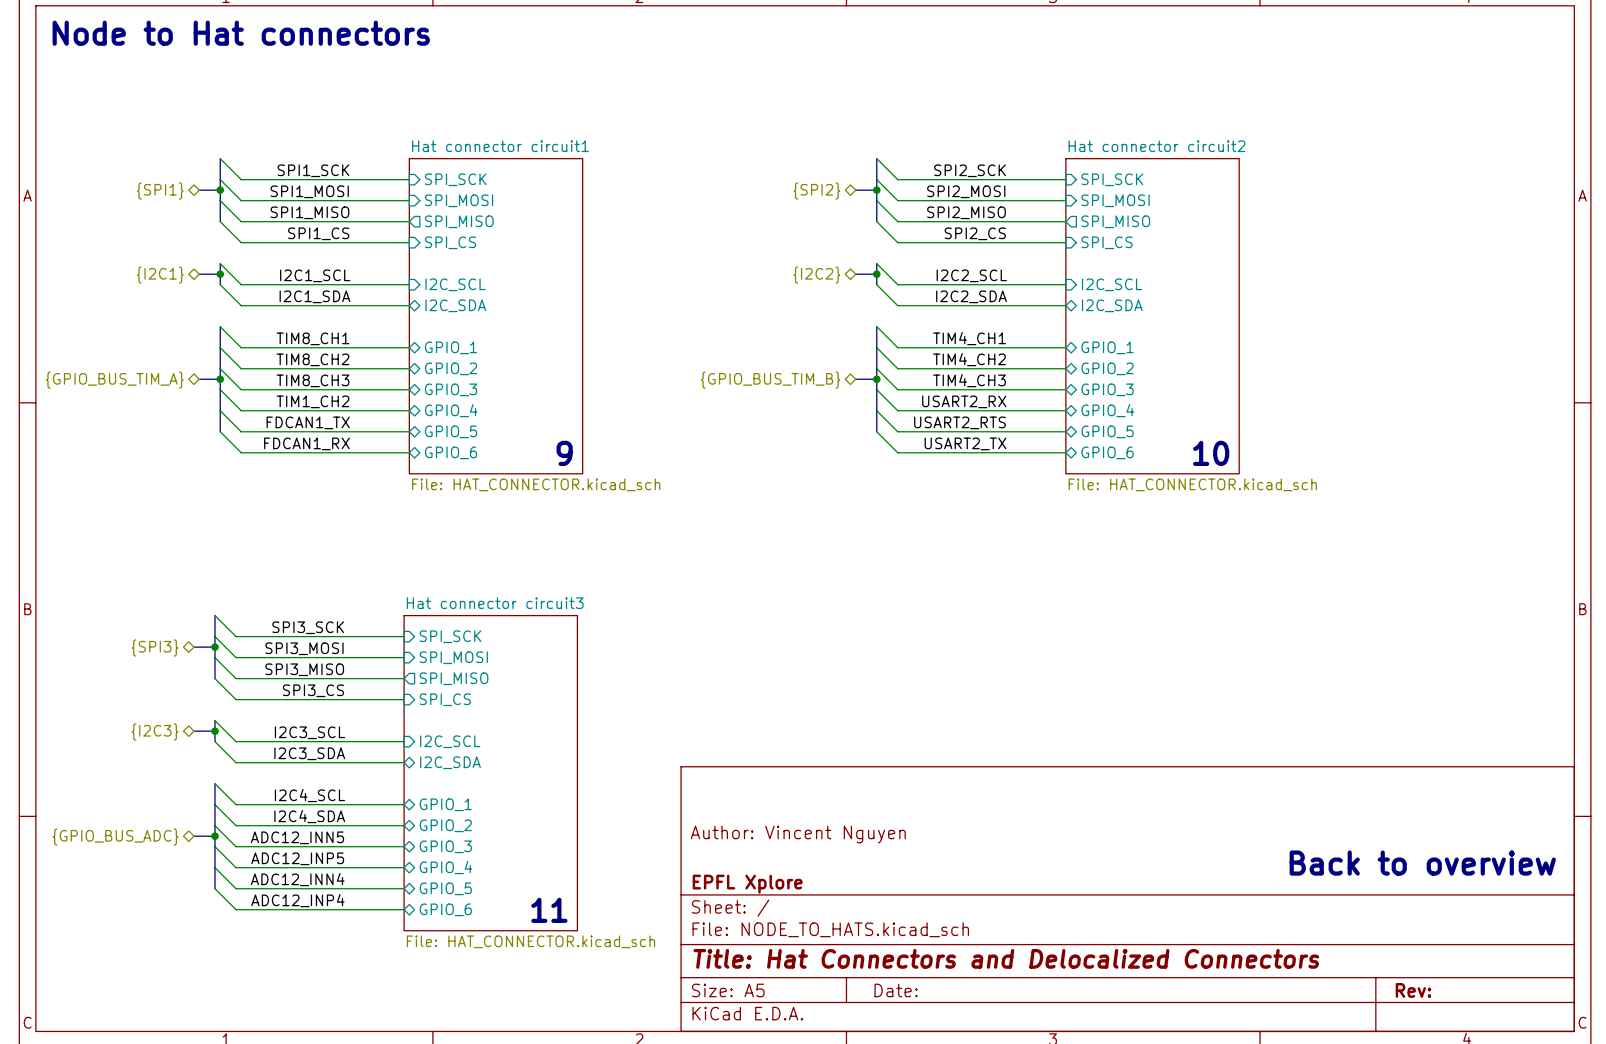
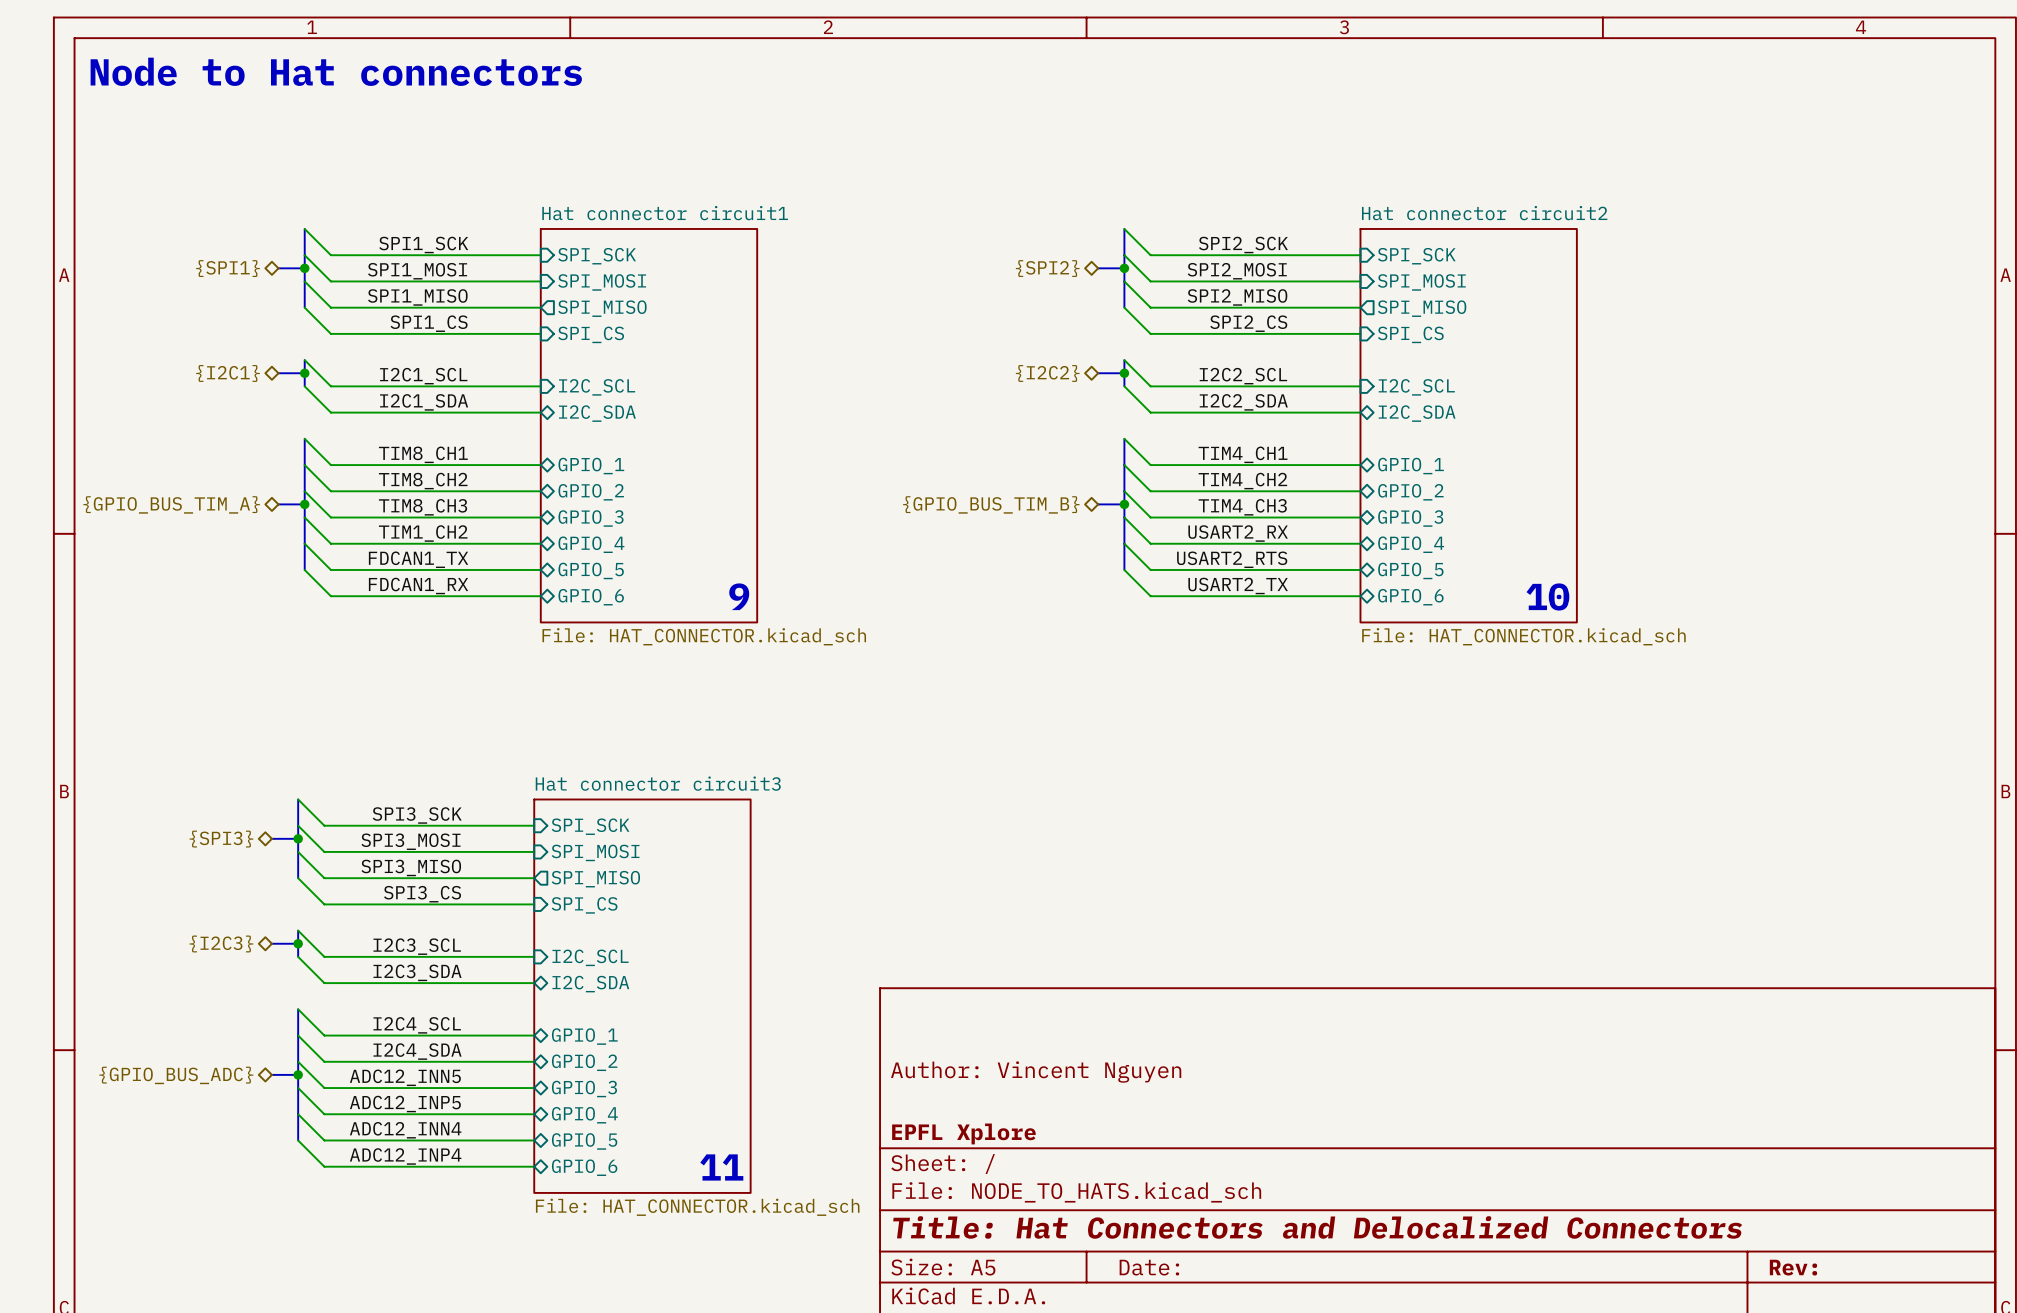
text: Back to overview (1422, 863) -> none

